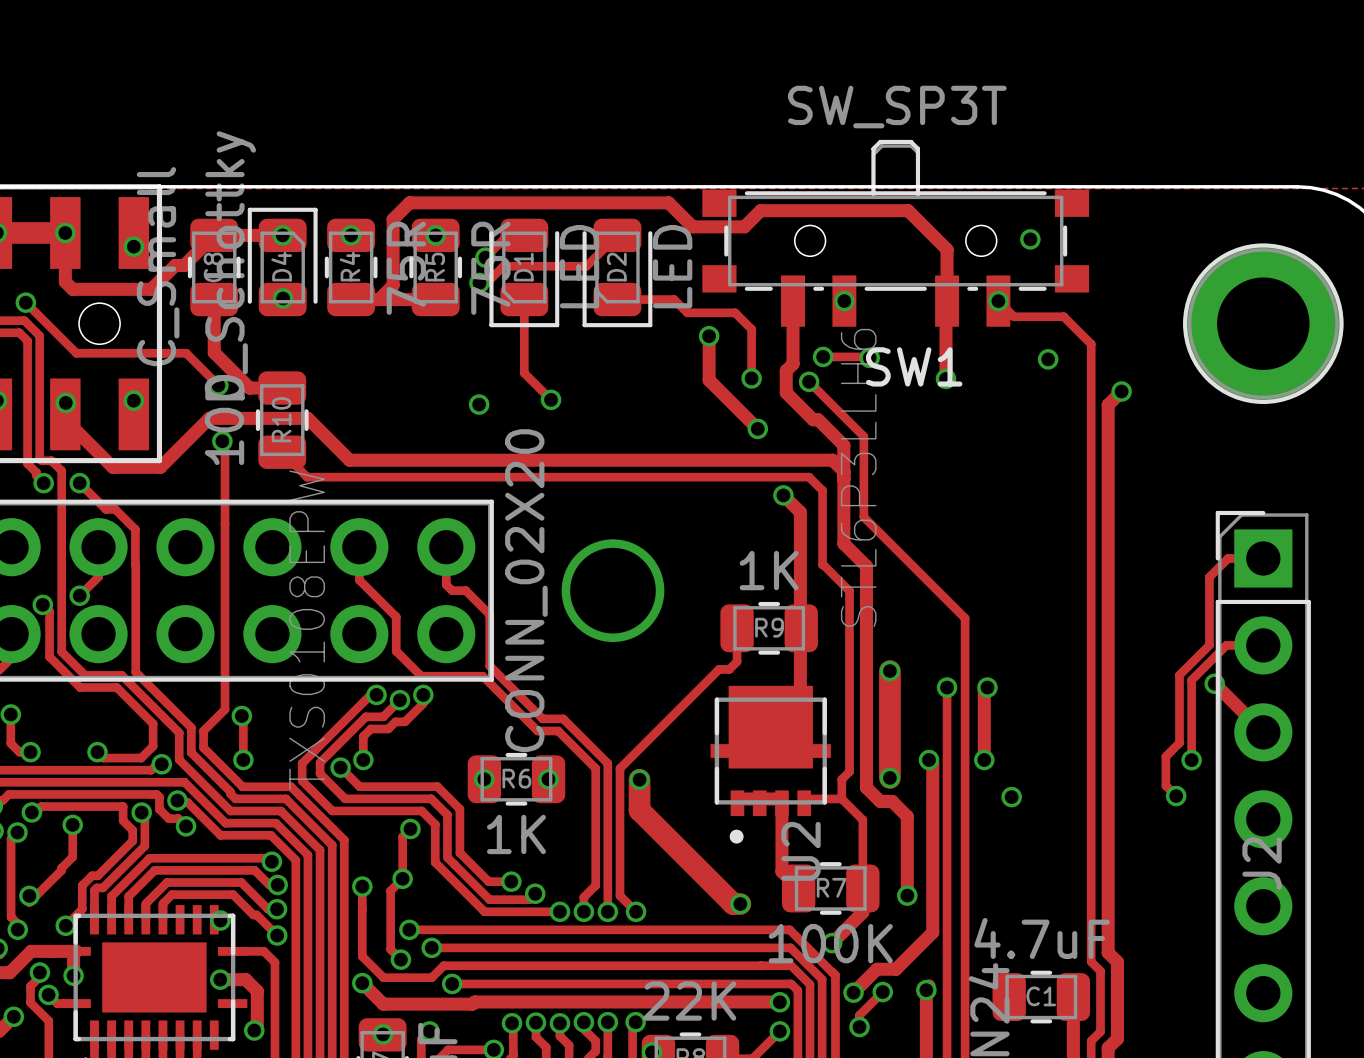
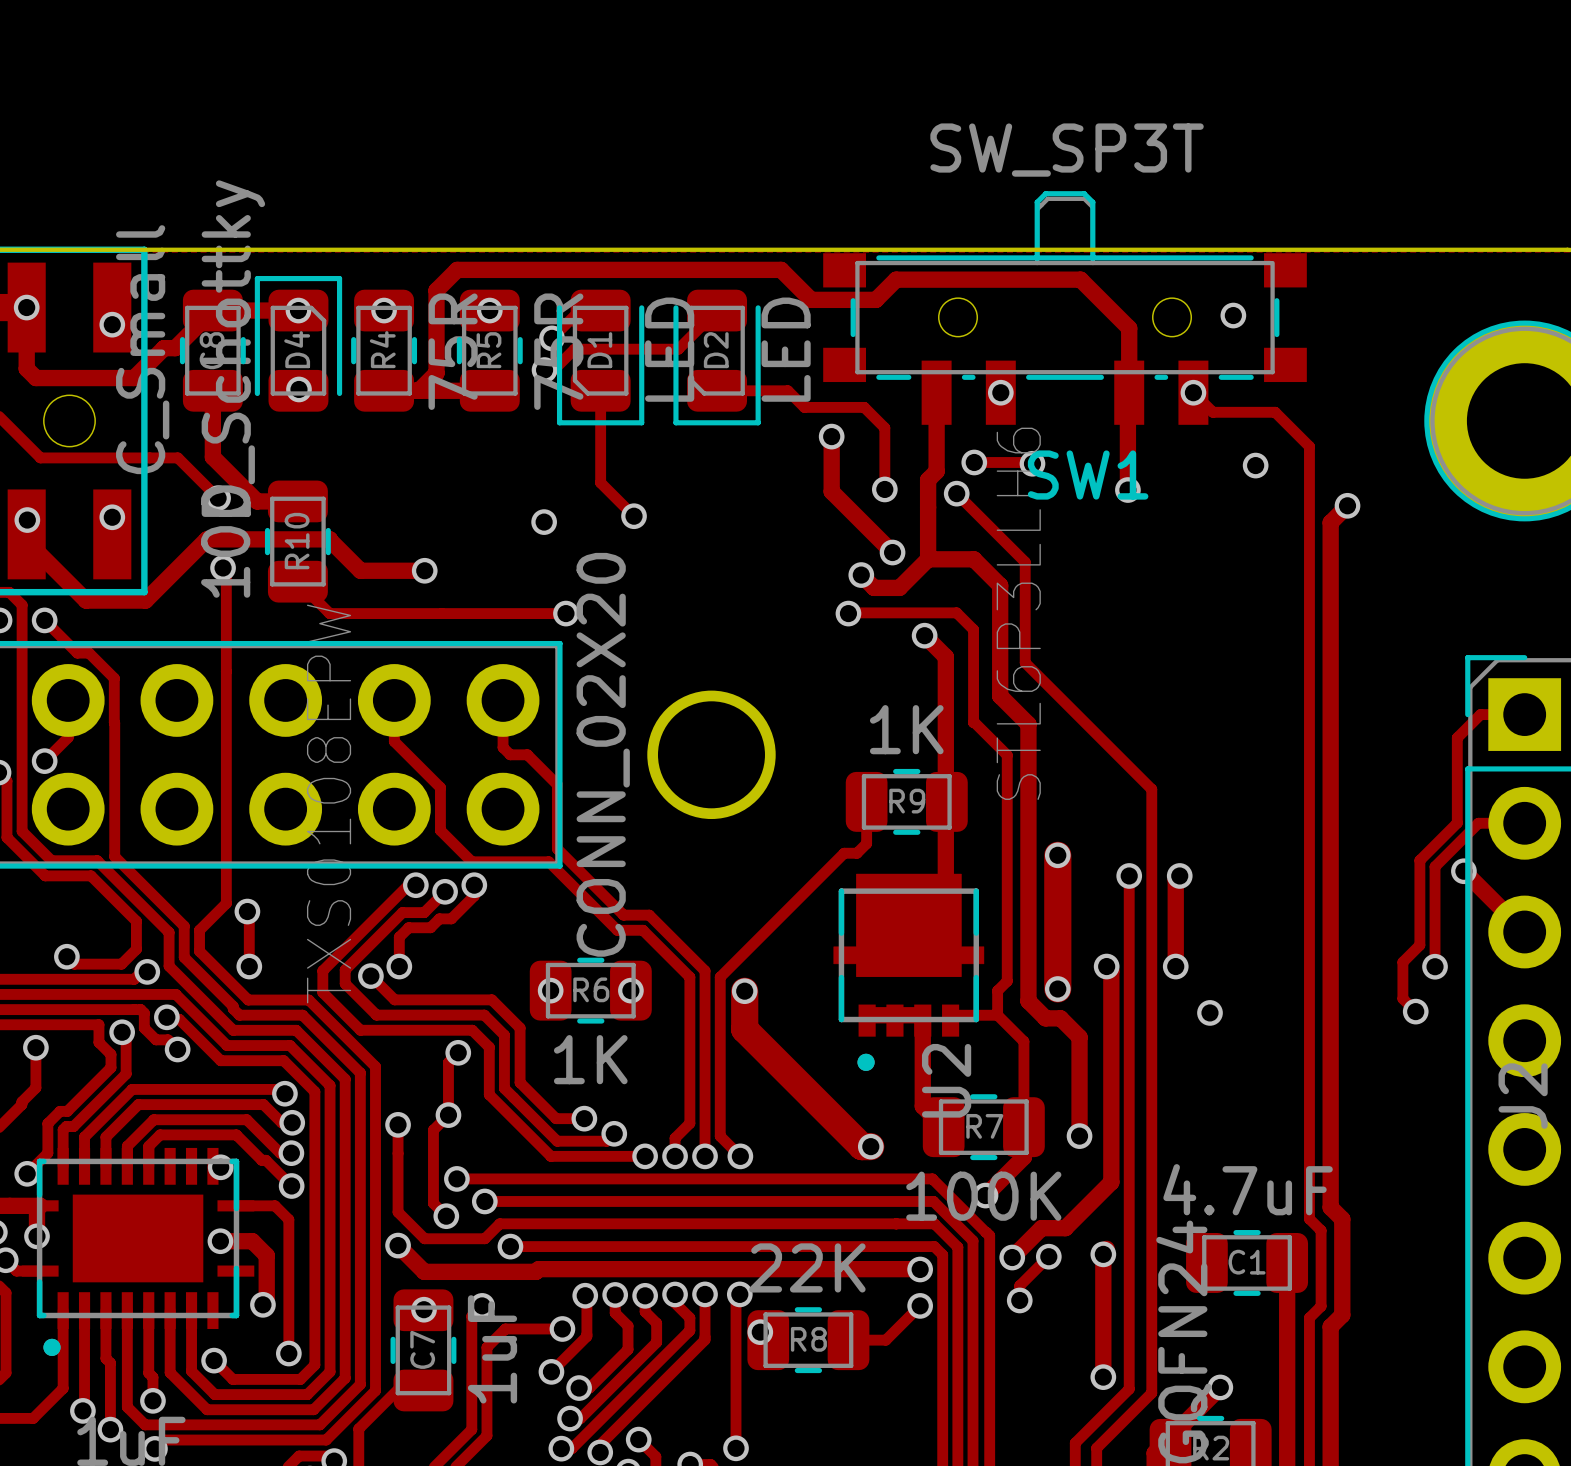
track: (786, 392) (813, 419) (818, 419) (843, 445) (843, 455) -> (928, 559) (973, 559) (1000, 585)
track: none -> (928, 507) (928, 559)
track: (307, 418) (349, 460) (832, 460) (843, 471) -> (329, 540) (360, 570) (424, 570)
track: none -> (928, 559) (899, 587) (874, 587) (861, 575)
via: none -> (424, 570)
via: none -> (861, 575)
track: (307, 477) (723, 477) -> (329, 612) (565, 613)
via: none -> (565, 613)
via: none -> (848, 613)

